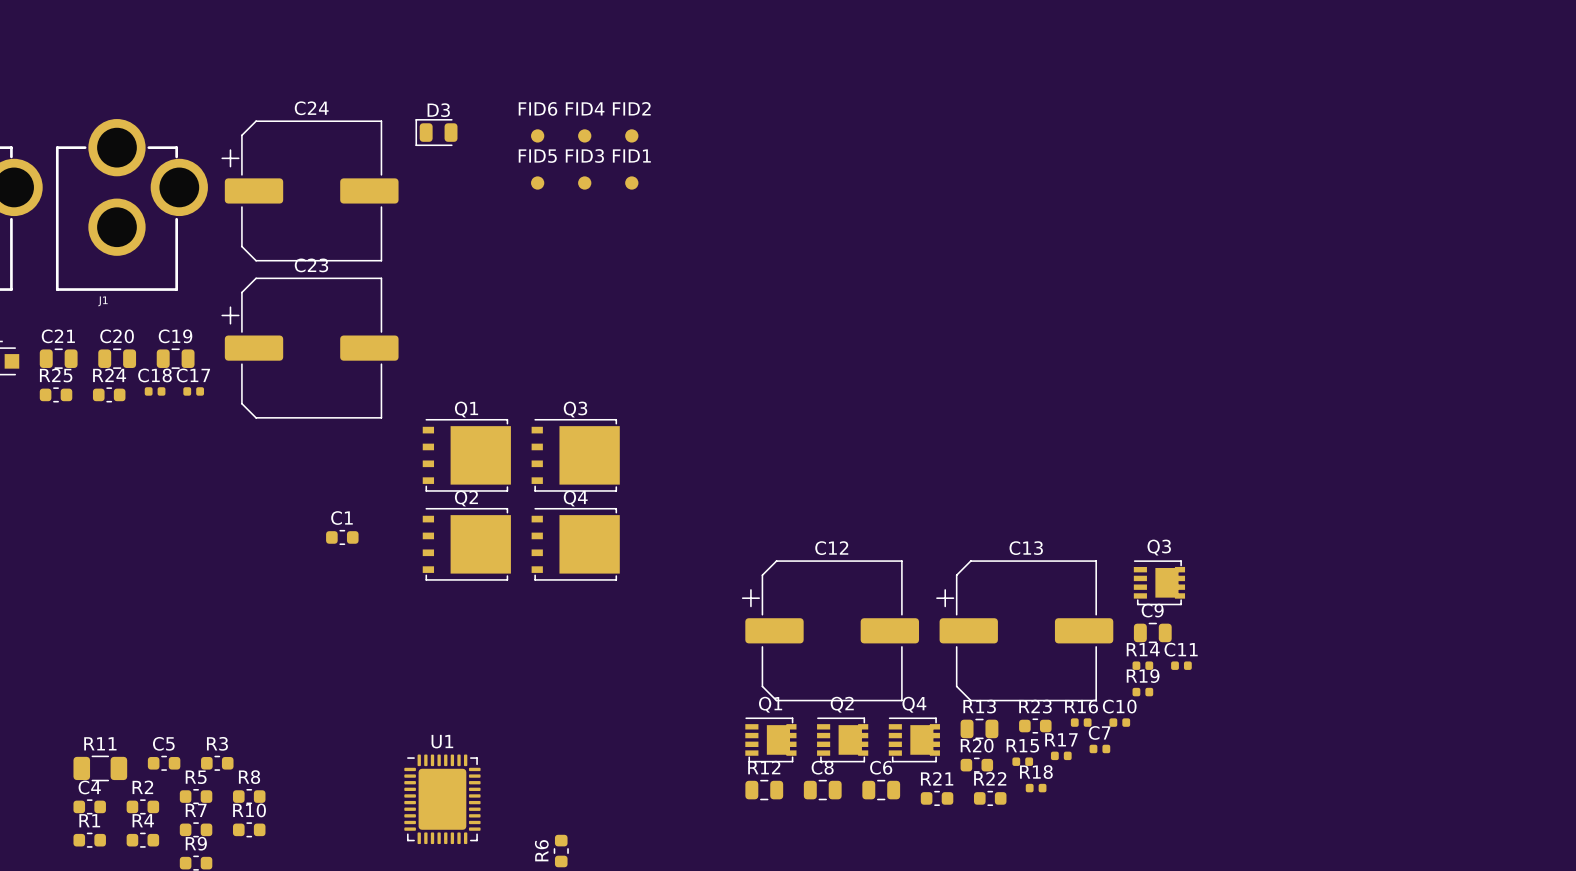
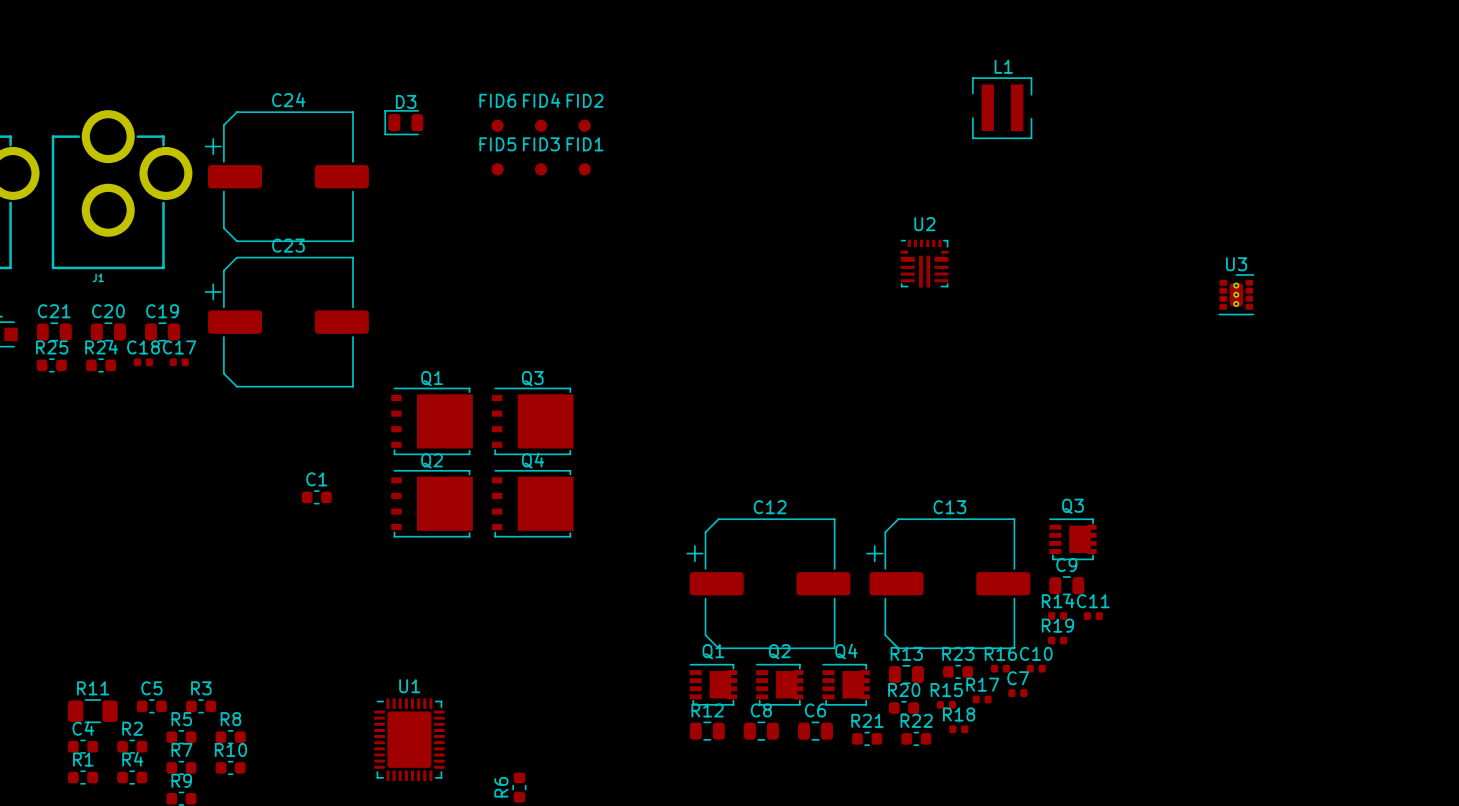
L1: none -> (1002, 108)
U2: none -> (924, 263)
U3: none -> (1236, 294)

